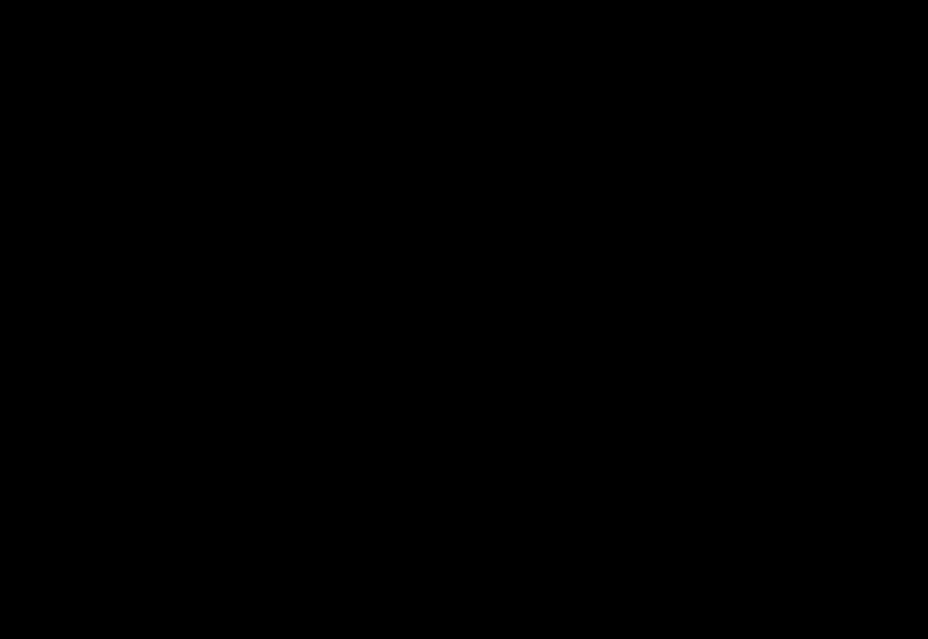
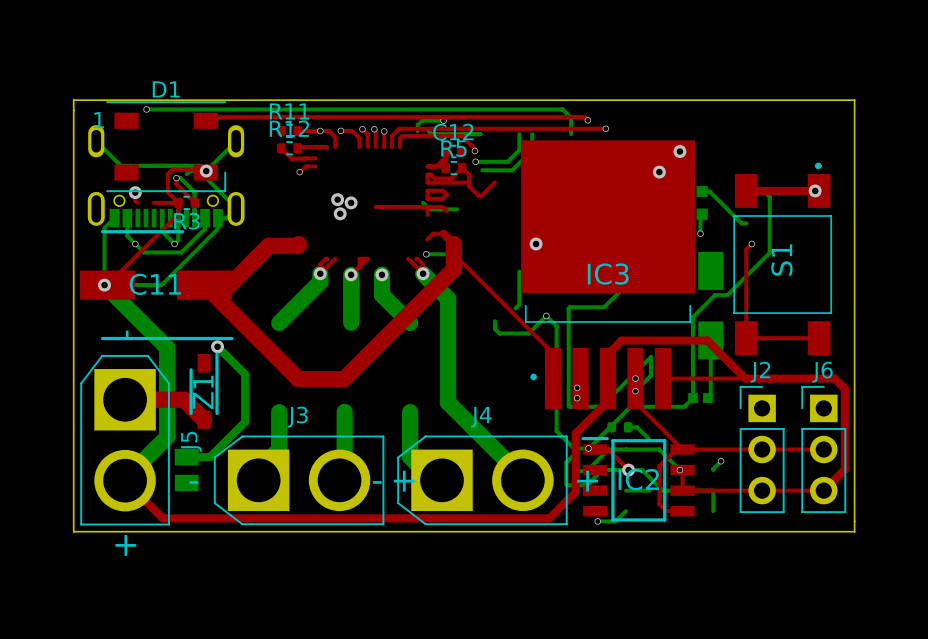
board edge: none -> (73, 100) (73, 531) (854, 531) (854, 100) (73, 100)
bottom track: none -> (146, 109) (562, 109) (571, 117) (571, 134)
via: none -> (146, 109)
bottom track: none -> (443, 120) (422, 120) (417, 125) (417, 130)
via: none -> (443, 120)
top track: none -> (587, 120) (584, 117) (214, 117) (205, 125)
via: none -> (587, 120)
top track: none -> (605, 128) (399, 128) (391, 136) (391, 147)
via: none -> (605, 128)
top track: none -> (362, 129) (367, 134) (367, 147)
via: none -> (362, 129)
top track: none -> (374, 129) (375, 147)
via: none -> (374, 129)
R11: none -> (289, 130)
top track: none -> (297, 130) (328, 130) (335, 137) (335, 147)
via: none -> (320, 130)
top track: none -> (340, 130) (352, 130) (359, 138) (359, 147)
via: none -> (340, 130)
bottom track: none -> (428, 130) (431, 134) (480, 134)
top track: none -> (384, 131) (383, 147)
via: none -> (384, 131)
bottom track: none -> (519, 134) (519, 150) (507, 161) (475, 161)
bottom track: none -> (532, 134) (532, 150) (512, 170) (482, 170)
bottom track: none -> (96, 141) (120, 165) (201, 165) (206, 171) (189, 171) (186, 174)
bottom track: none -> (236, 141) (203, 174)
D1: none -> (166, 146)
top track: none -> (327, 147) (297, 148)
top track: none -> (399, 147) (399, 138) (402, 136) (461, 136) (474, 151)
top track: none -> (281, 148) (291, 158) (315, 158)
R12: none -> (289, 148)
C12: none -> (453, 151)
via: none -> (474, 151)
via: none -> (679, 151)
via: none -> (475, 161)
top track: none -> (315, 166) (306, 166) (299, 172)
top track: none -> (427, 166) (445, 168) (445, 152) (446, 151) (446, 156) (436, 166)
R5: none -> (453, 168)
via: none -> (206, 171)
top track: none -> (205, 172) (202, 169) (172, 169) (167, 174) (167, 192) (178, 202)
via: none -> (299, 172)
via: none -> (659, 172)
bottom track: none -> (202, 174) (236, 208) (226, 218) (217, 218) (217, 228) (161, 285) (104, 285)
part: none -> (166, 176)
top track: none -> (176, 178) (176, 184) (194, 202)
bottom track: none -> (176, 178) (180, 178) (194, 192) (194, 218)
via: none -> (176, 178)
top track: none -> (469, 182) (468, 182) (427, 182) (427, 174) (430, 174) (434, 178) (451, 178) (462, 168) (469, 174) (469, 186) (478, 195) (481, 195) (494, 182)
top track: none -> (427, 190) (427, 198) (442, 198) (446, 194) (442, 190) (427, 190)
top track: none -> (746, 190) (819, 190)
via: none -> (815, 190)
bottom track: none -> (701, 191) (709, 191) (741, 223) (746, 223)
top track: none -> (135, 192) (135, 200) (137, 202)
via: none -> (135, 192)
via: none -> (337, 199)
top track: none -> (153, 202) (178, 202)
top track: none -> (178, 202) (178, 213) (107, 285)
R3: none -> (186, 202)
via: none -> (351, 202)
bottom track: none -> (423, 202) (429, 209) (457, 209)
part: none -> (702, 202)
bottom track: none -> (743, 202) (752, 192) (765, 192) (769, 196) (769, 252) (727, 295) (715, 295) (692, 317) (692, 363)
top track: none -> (375, 206) (442, 206) (446, 211)
top track: none -> (427, 206) (427, 215)
via: none -> (340, 213)
bottom track: none -> (702, 214) (700, 233)
bottom track: none -> (114, 218) (104, 228) (104, 285)
bottom track: none -> (127, 218) (127, 235) (143, 252) (181, 252) (205, 228) (205, 218)
bottom track: none -> (162, 218) (162, 231) (174, 244) (178, 240) (178, 218)
via: none -> (700, 233)
top track: none -> (427, 239) (433, 233) (443, 233) (453, 244) (453, 269) (343, 379) (298, 379) (204, 285) (229, 285) (268, 245) (297, 245) (298, 244)
via: none -> (135, 244)
via: none -> (174, 244)
via: none -> (536, 244)
top track: none -> (751, 244) (746, 249) (746, 338) (819, 338)
via: none -> (751, 244)
bottom track: none -> (457, 248) (450, 254) (426, 254)
via: none -> (426, 254)
top track: none -> (453, 254) (552, 353) (552, 378)
top track: none -> (327, 258) (320, 264) (320, 273) (335, 258)
top track: none -> (359, 258) (359, 266) (351, 274) (367, 258) (359, 258)
top track: none -> (408, 258) (423, 273) (423, 264) (416, 258)
S1: none -> (782, 258)
bottom track: none -> (649, 262) (604, 307) (568, 308) (568, 405) (601, 406) (650, 357) (650, 375) (635, 391)
bottom track: none -> (519, 271) (519, 304) (515, 308)
bottom track: none -> (320, 273) (320, 281) (279, 323)
via: none -> (320, 273)
bottom track: none -> (423, 273) (448, 298) (448, 402) (514, 468) (514, 480)
via: none -> (423, 273)
bottom track: none -> (351, 274) (351, 322)
via: none -> (351, 274)
bottom track: none -> (381, 274) (381, 294) (410, 323)
via: none -> (381, 274)
IC3: none -> (608, 274)
bottom track: none -> (104, 285) (167, 347) (167, 436) (125, 479)
via: none -> (104, 285)
C11: none -> (156, 285)
part: none -> (710, 305)
via: none -> (546, 315)
bottom track: none -> (494, 321) (494, 329) (499, 333) (528, 333) (546, 315) (556, 326) (556, 431) (577, 451)
bottom track: none -> (710, 340) (710, 395) (707, 398)
bottom track: none -> (217, 346) (245, 374) (245, 421) (209, 457) (186, 457)
via: none -> (217, 346)
top track: none -> (608, 354) (621, 340) (707, 340) (745, 378) (834, 378) (844, 388) (844, 469) (823, 490) (682, 490) (682, 470)
bottom track: none -> (693, 363) (693, 398) (684, 406) (630, 406) (588, 448) (576, 448)
top track: none -> (635, 378) (635, 402) (682, 449)
via: none -> (635, 378)
top track: none -> (663, 378) (769, 378)
via: none -> (577, 387)
Z1: none -> (204, 390)
via: none -> (635, 391)
via: none -> (577, 398)
part: none -> (700, 398)
top track: none -> (125, 399) (183, 399) (204, 419)
top track: none -> (608, 401) (575, 433) (575, 492) (549, 518) (162, 518) (125, 480)
bottom track: none -> (344, 411) (344, 467) (331, 480)
bottom track: none -> (279, 412) (279, 449) (248, 480)
bottom track: none -> (410, 412) (410, 457) (433, 480)
part: none -> (619, 427)
bottom track: none -> (626, 427) (637, 427) (649, 439)
J5: none -> (125, 440)
via: none -> (588, 448)
top track: none -> (595, 449) (608, 449) (628, 470)
J2: none -> (762, 449)
top track: none -> (823, 449) (676, 449) (659, 466) (659, 504) (666, 511) (682, 511)
J6: none -> (823, 449)
bottom track: none -> (577, 451) (566, 462) (567, 485) (587, 485) (602, 470)
bottom track: none -> (721, 461) (713, 470)
via: none -> (721, 461)
part: none -> (186, 470)
bottom track: none -> (599, 470) (642, 470) (662, 490) (713, 490) (713, 511)
via: none -> (628, 470)
bottom track: none -> (679, 470) (659, 449) (608, 449) (586, 471) (577, 471)
via: none -> (679, 470)
IC2: none -> (638, 479)
J3: none -> (299, 480)
J4: none -> (482, 480)
bottom track: none -> (625, 490) (649, 490)
bottom track: none -> (625, 511) (615, 521) (597, 521)
via: none -> (597, 521)

